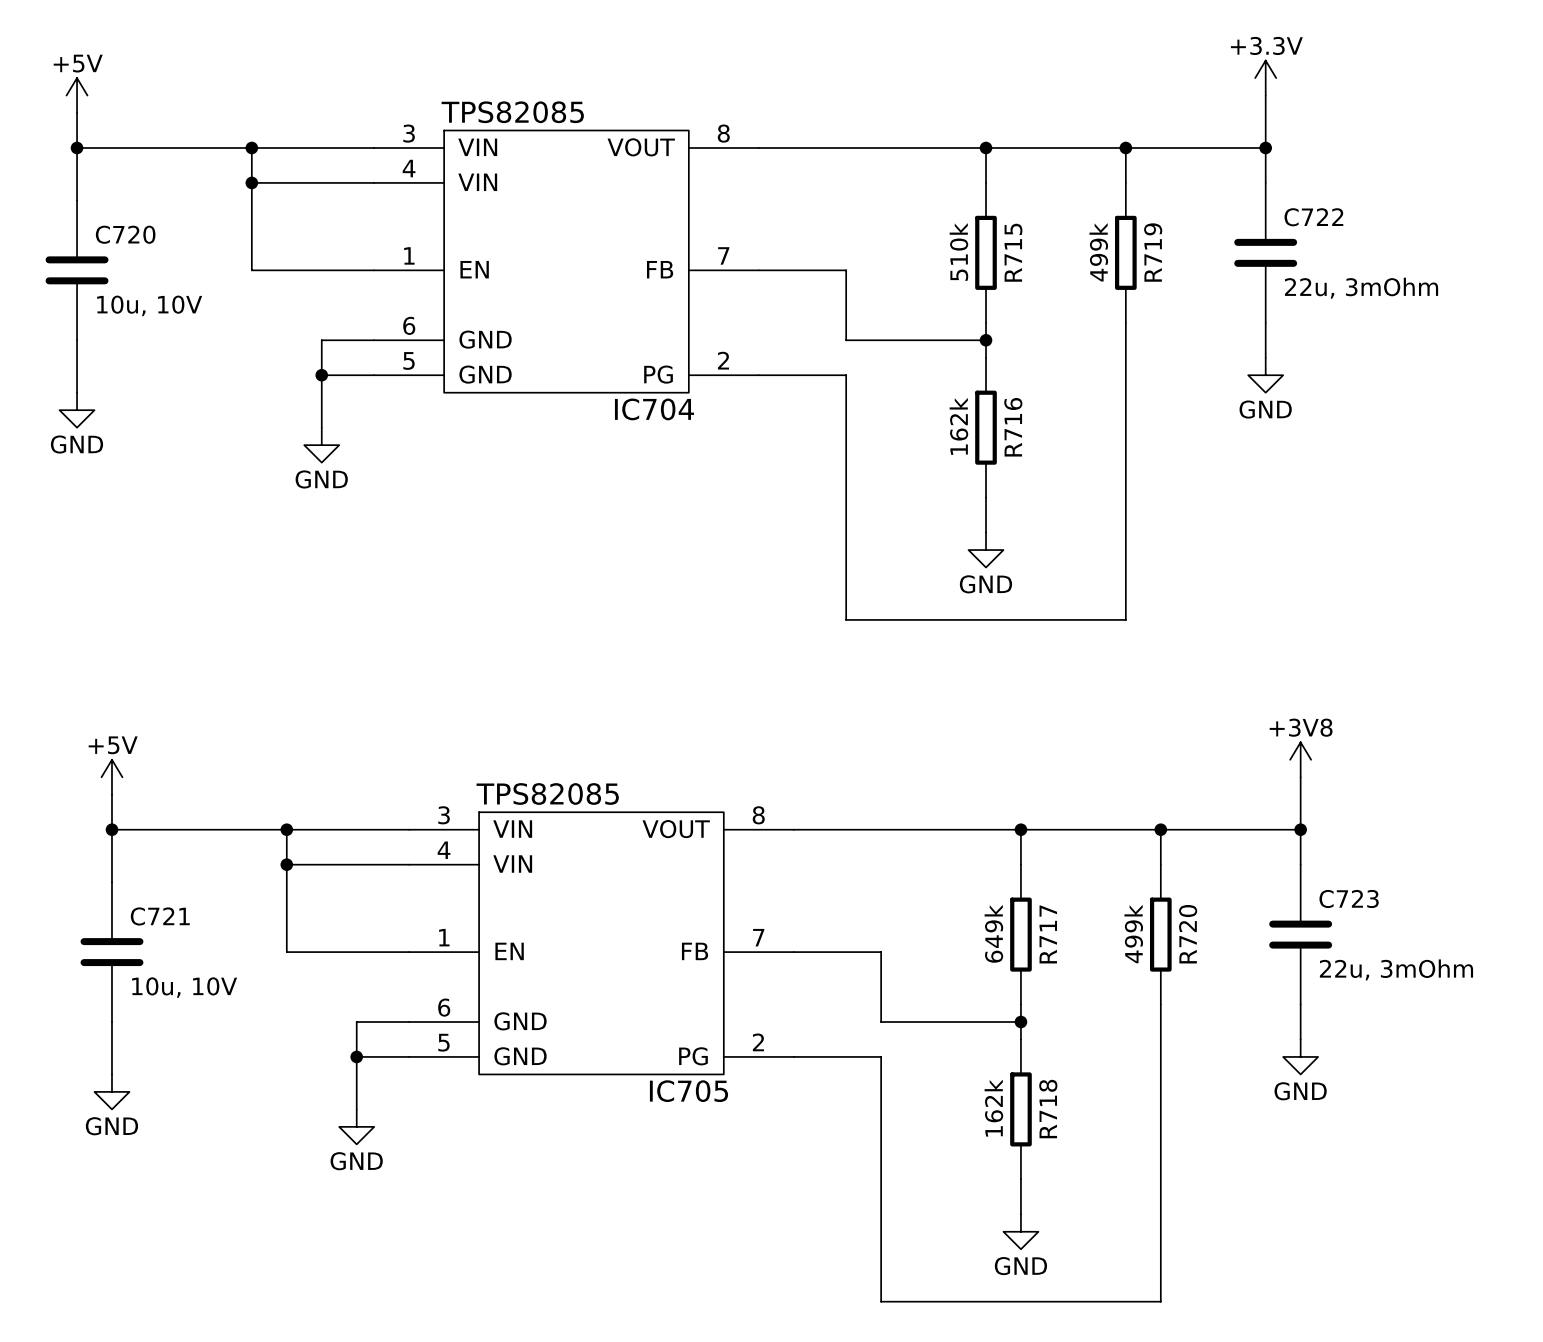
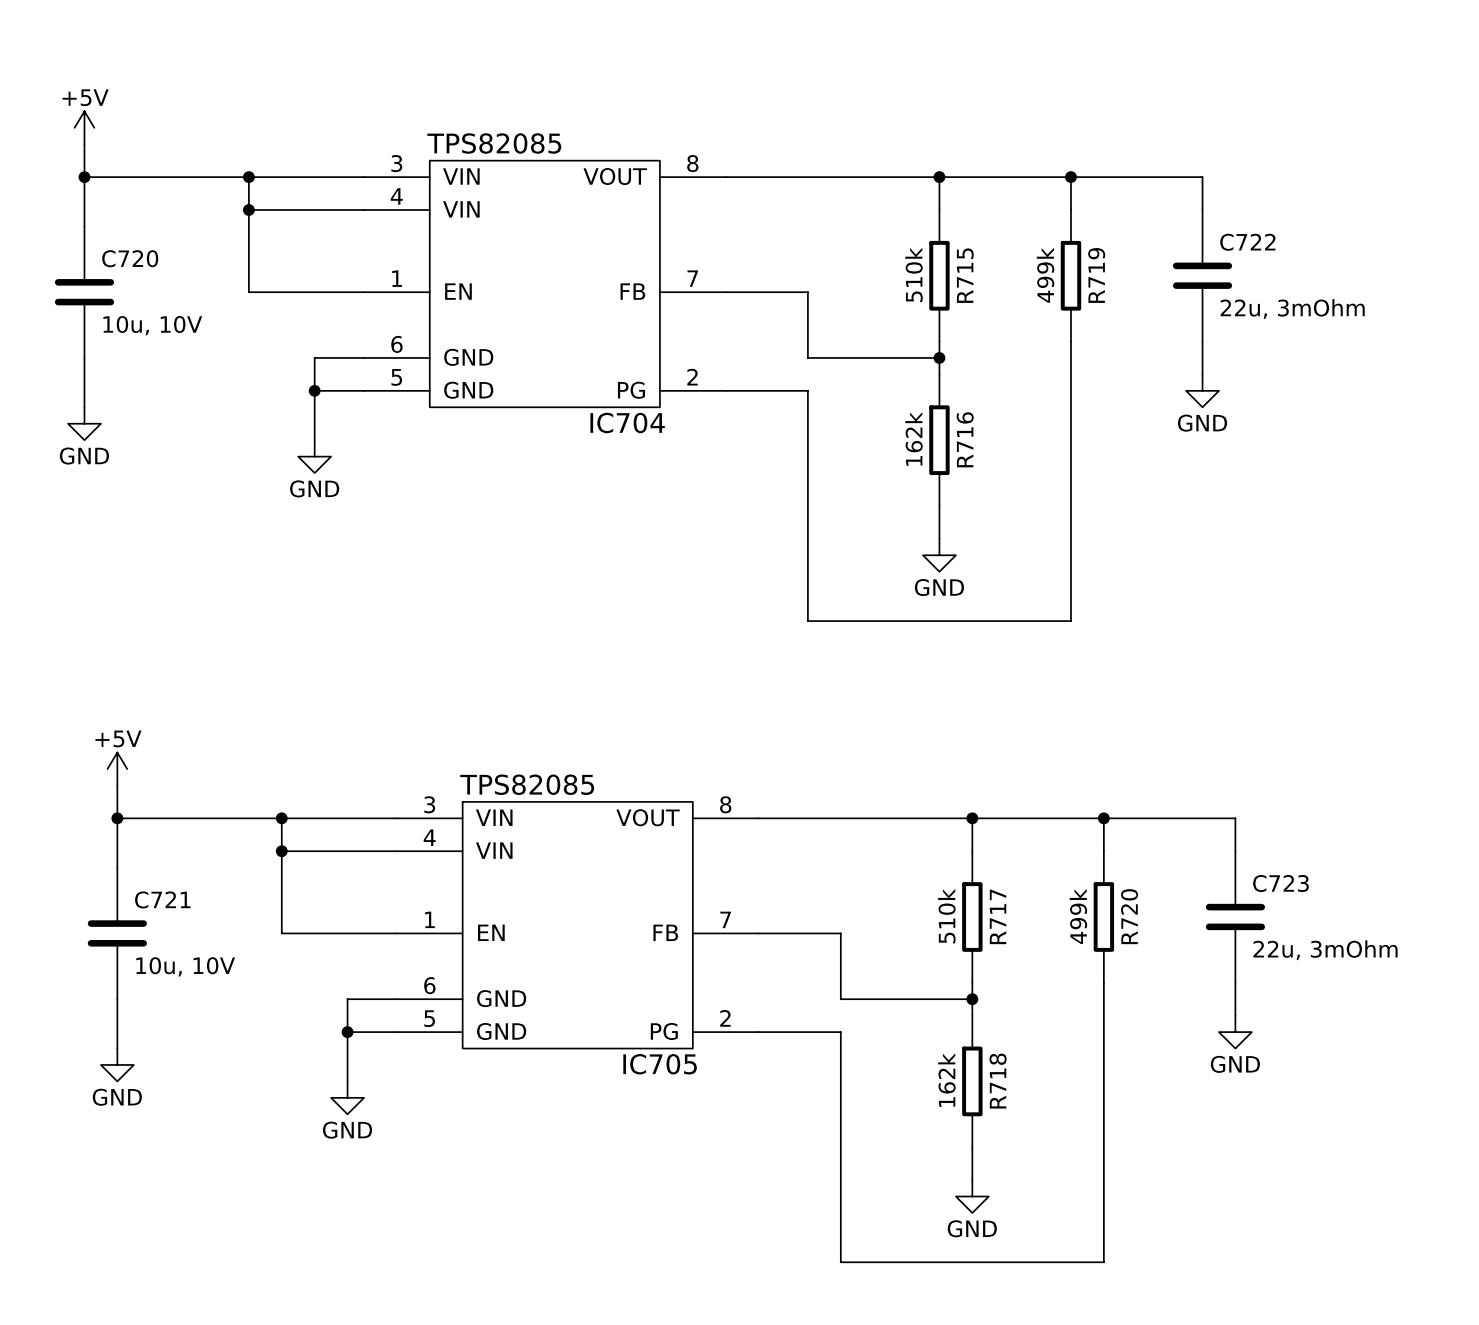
power symbol: +3.3V (1265, 78) -> none
wire: (1265, 95) (1265, 147) -> none
junction: (1265, 147) -> none
power symbol: +3V8 (1300, 759) -> none
wire: (1300, 777) (1300, 829) -> none
junction: (1300, 829) -> none
R717 value: 649k (993, 933) -> 510k (946, 916)

